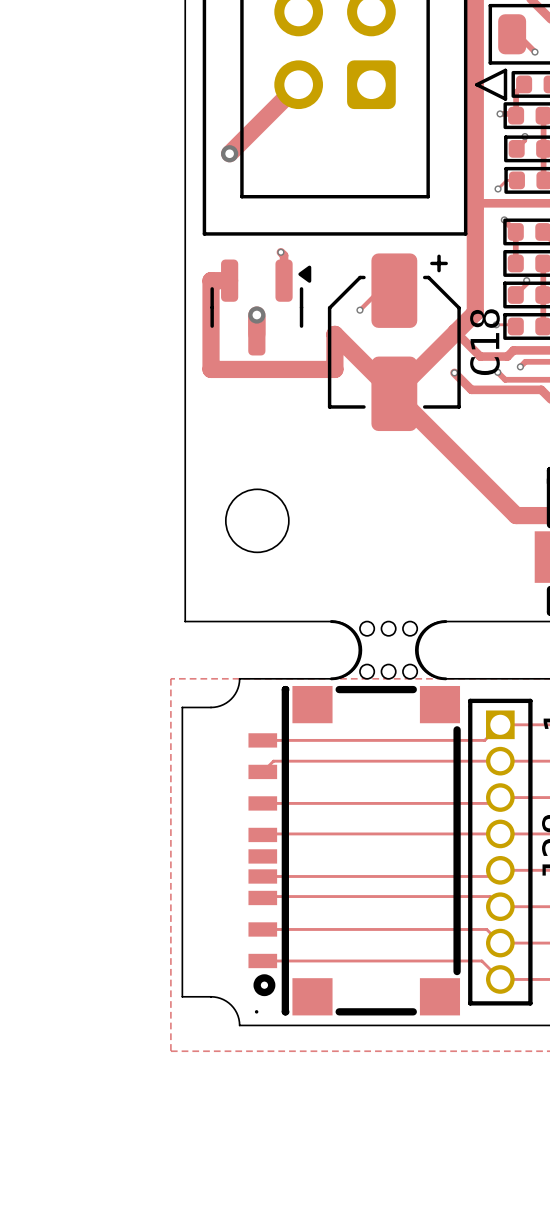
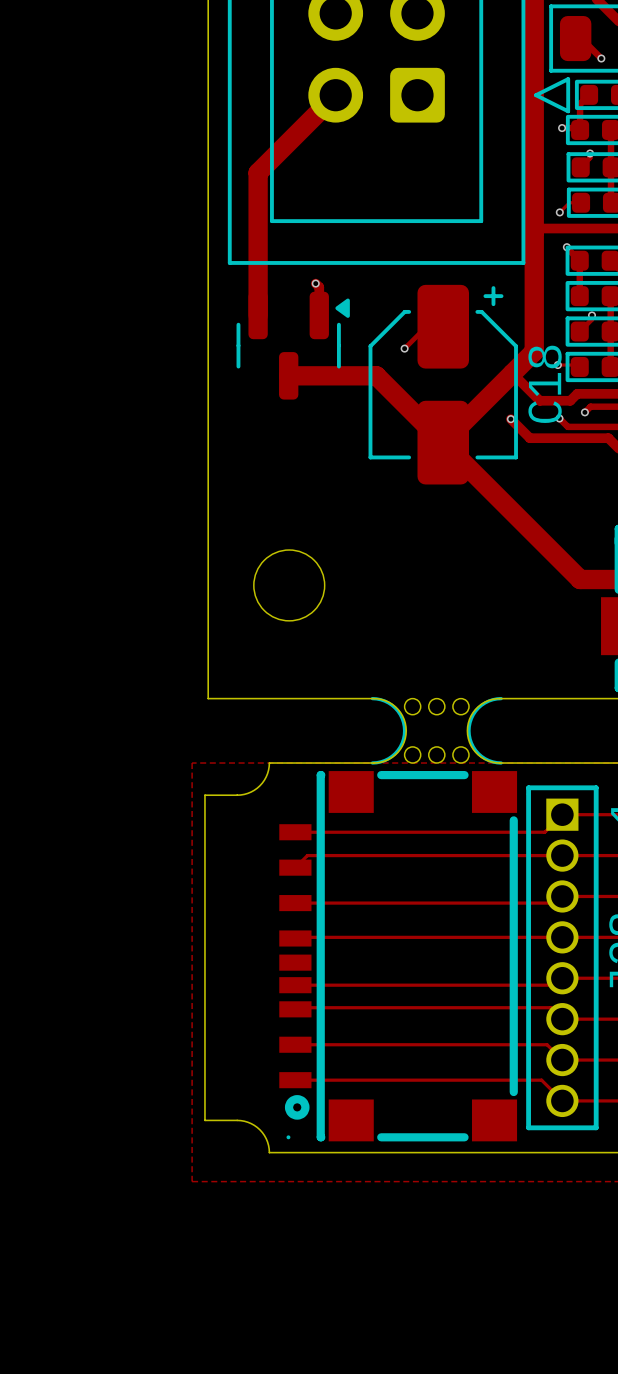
track: none -> (258, 172) (258, 315)
via: (229, 153) -> none
track: (229, 280) (211, 280) (211, 369) (334, 369) (334, 334) -> (288, 375) (376, 375)
via: (256, 315) -> none

